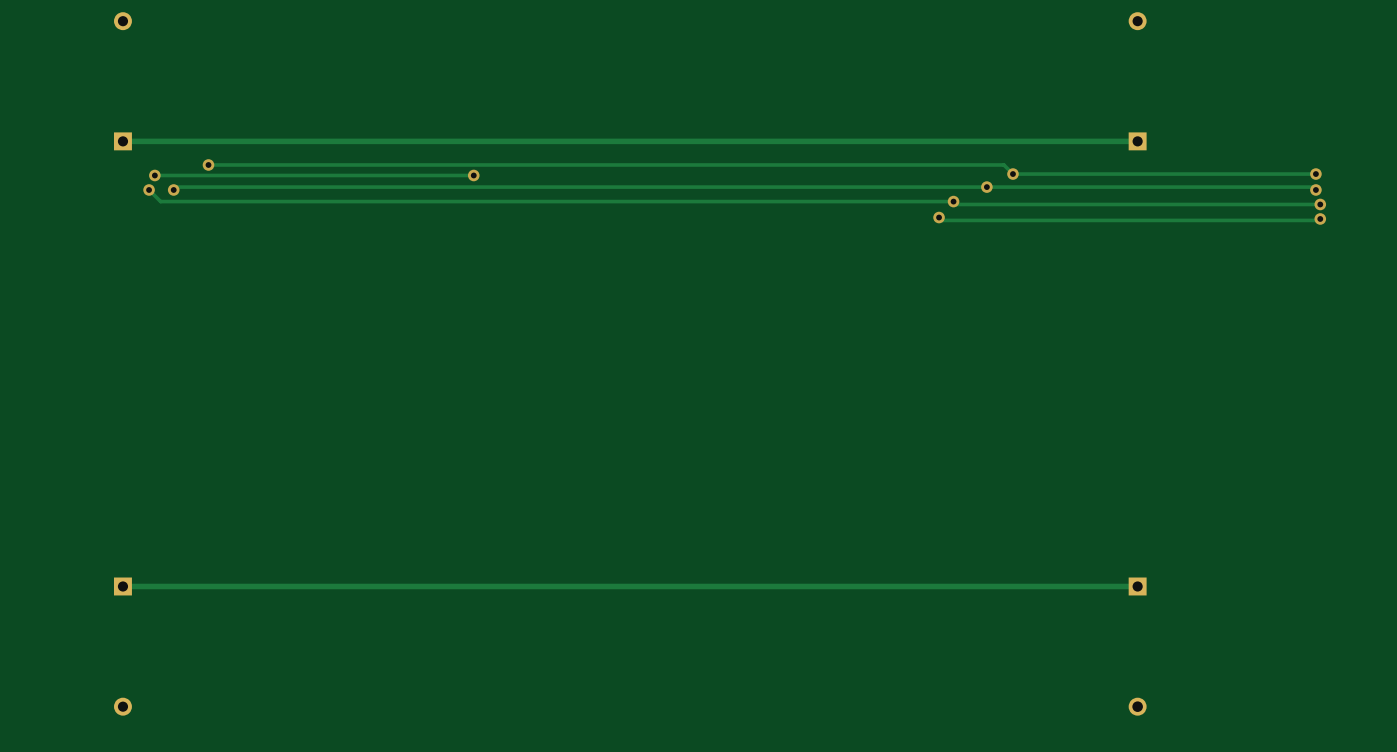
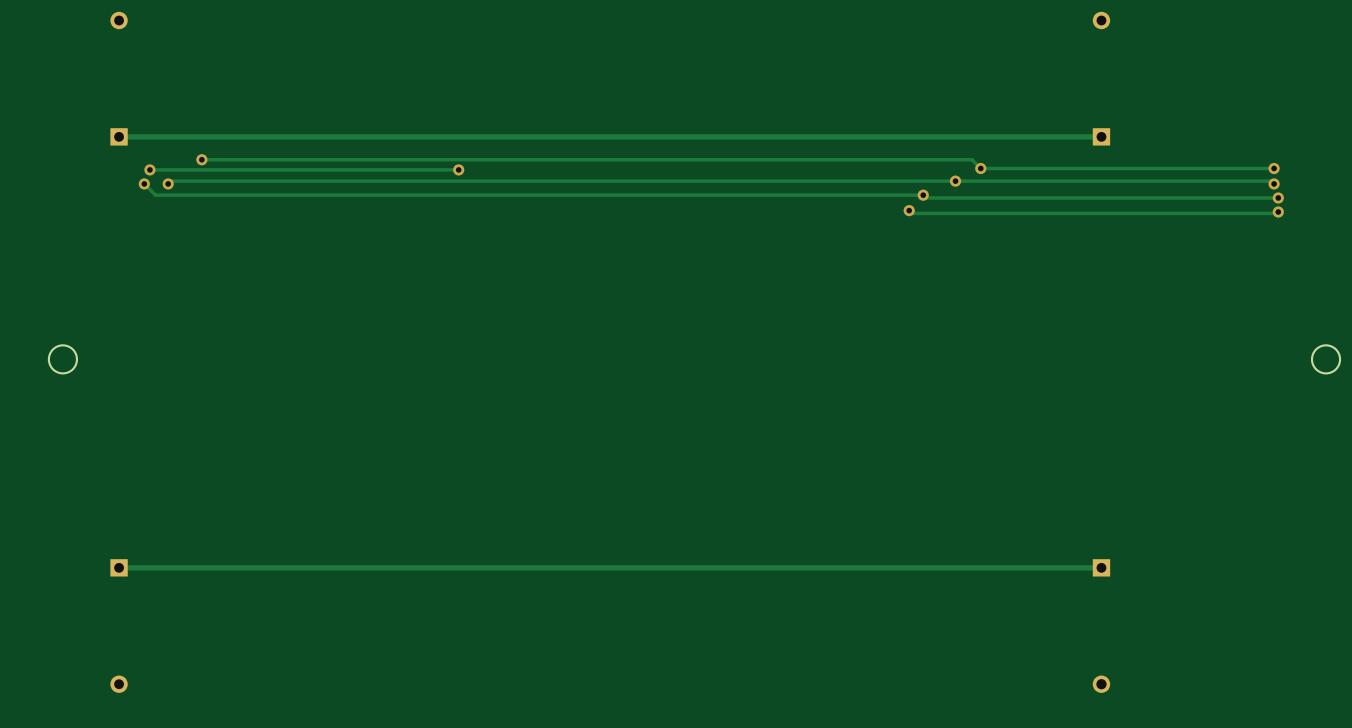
round board edge: none -> [47, 344, 79, 375]
round board edge: none -> [1310, 344, 1342, 375]

